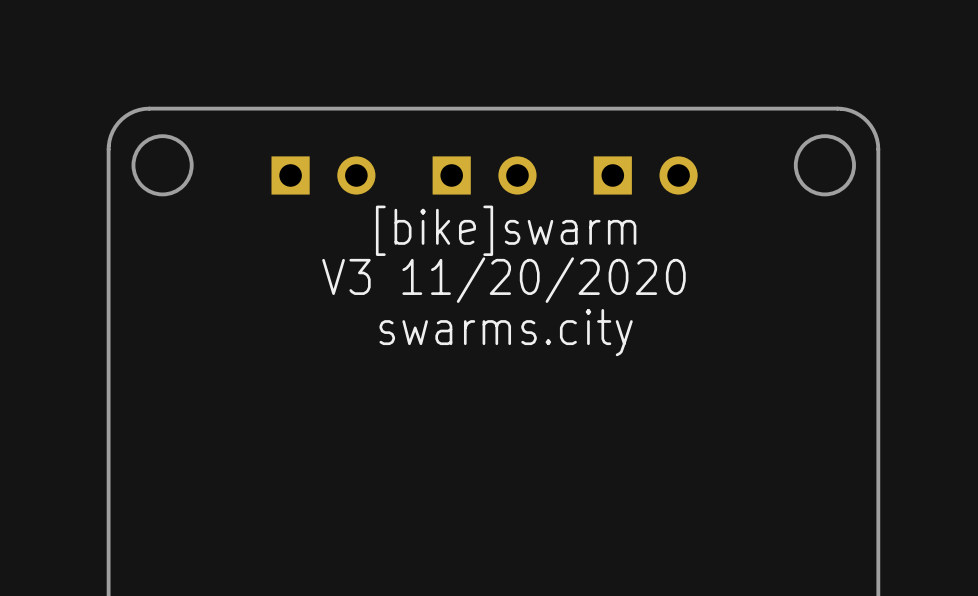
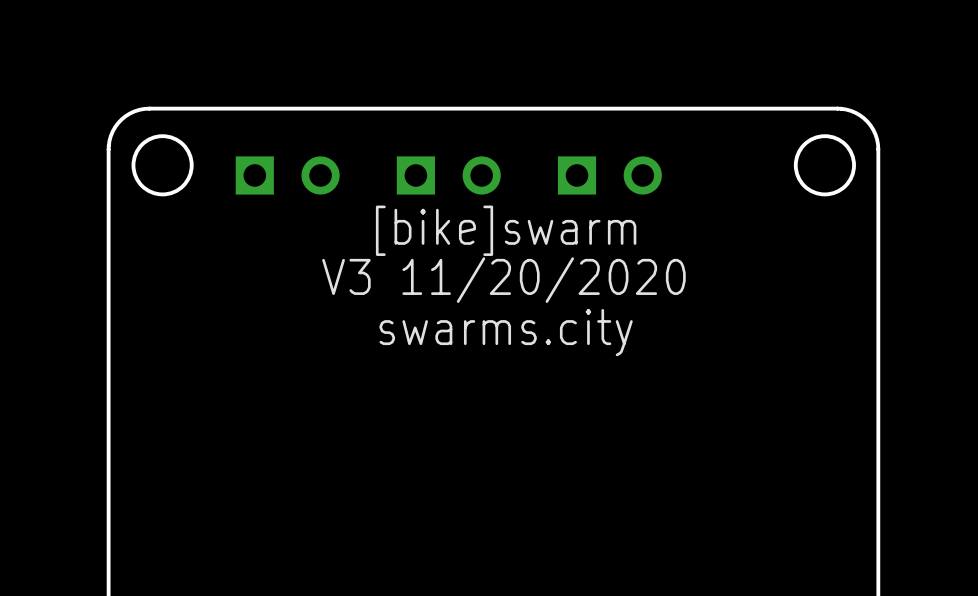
part position: (323, 175) -> (287, 175)
part position: (484, 175) -> (448, 175)
part position: (645, 175) -> (609, 175)

